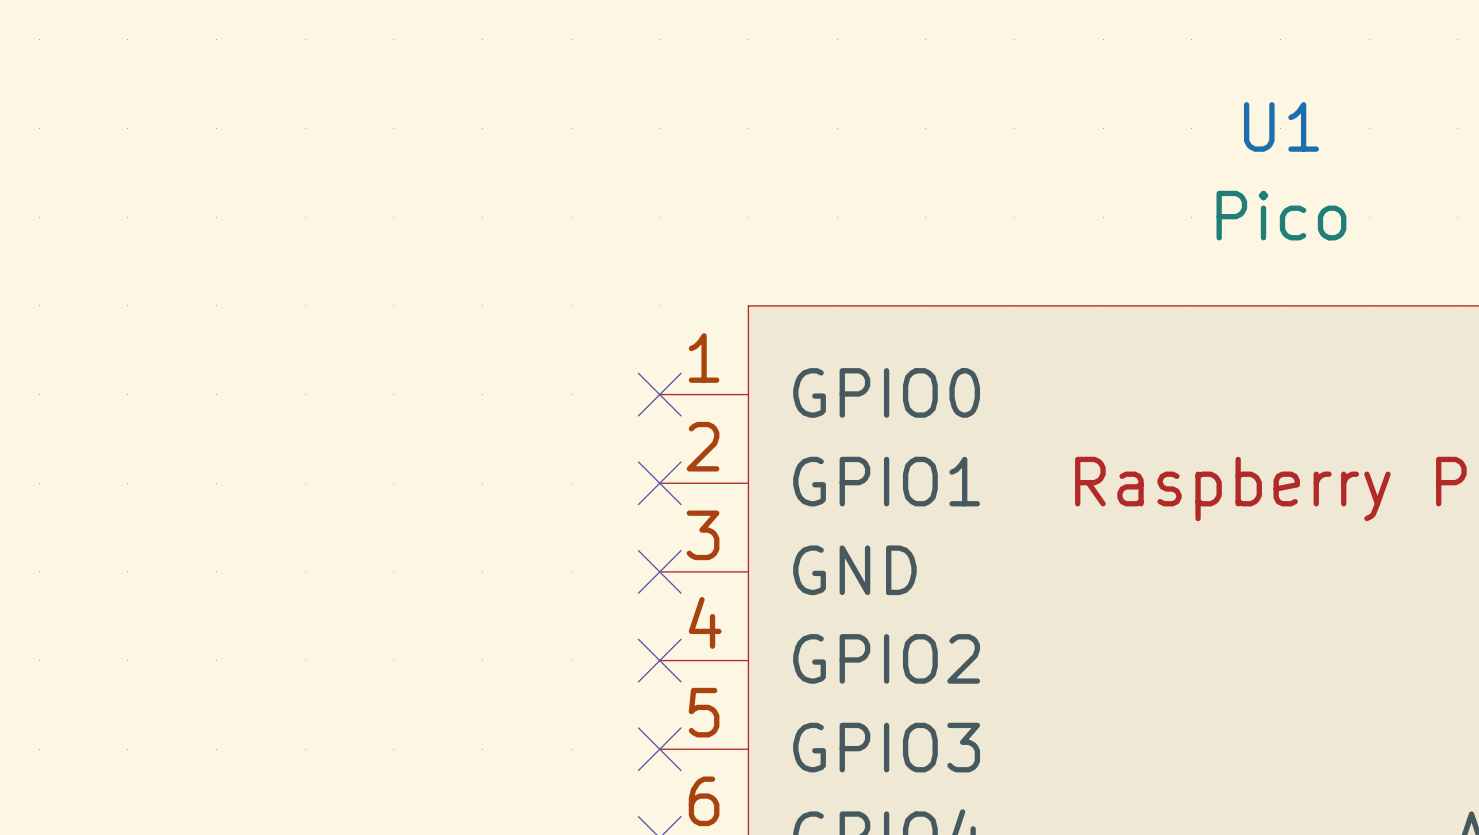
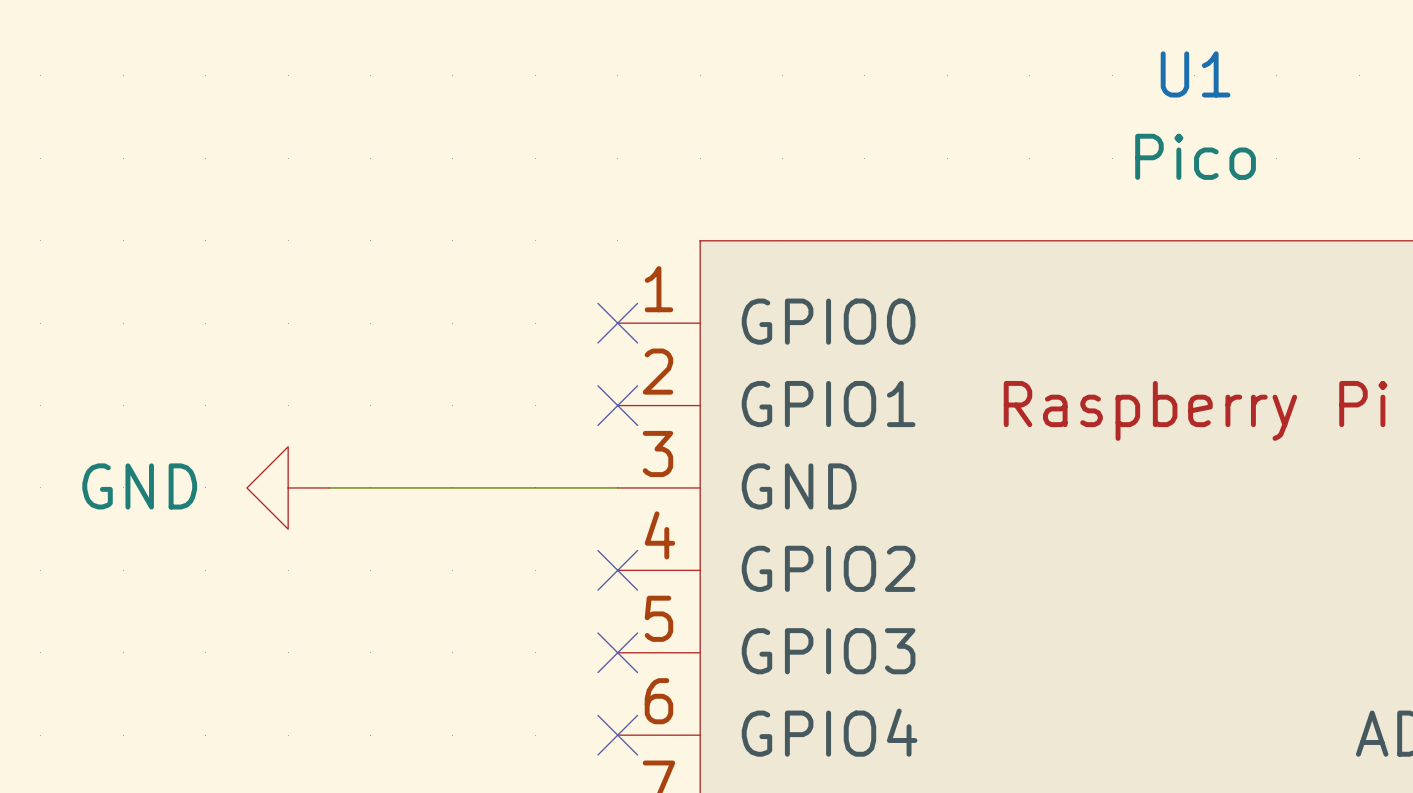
power symbol: none -> GND (288, 487)
wire: none -> (329, 487) (617, 487)
no-connect mark: (659, 571) -> none

